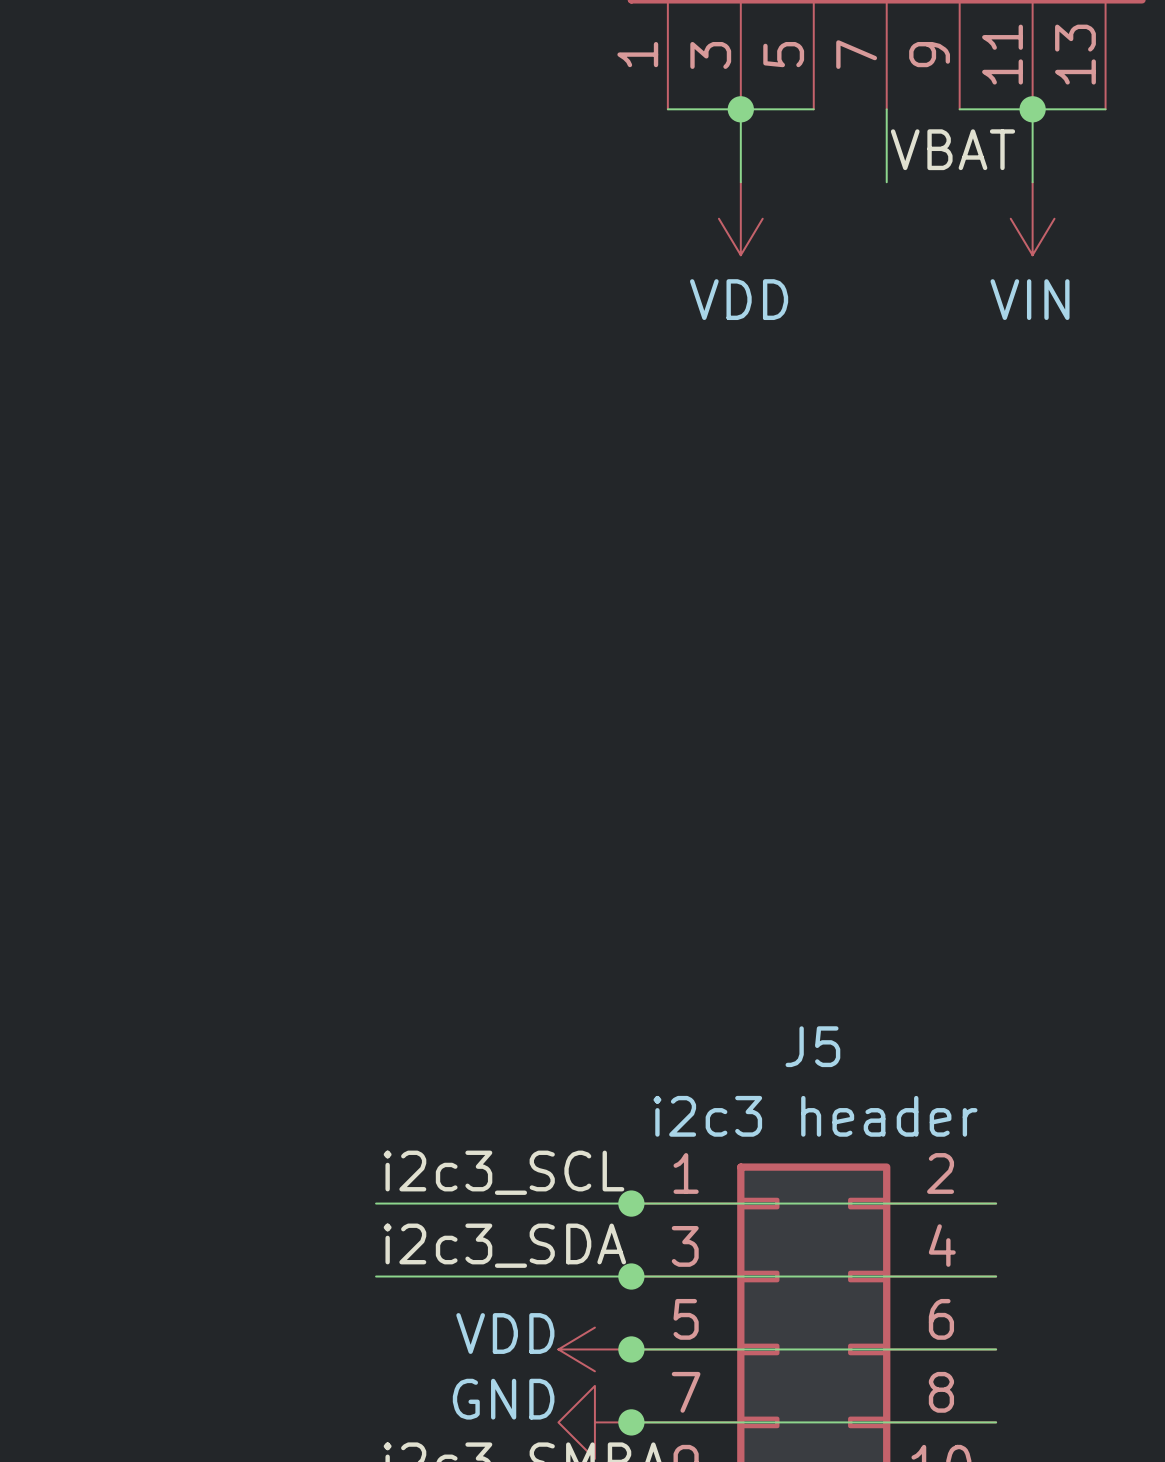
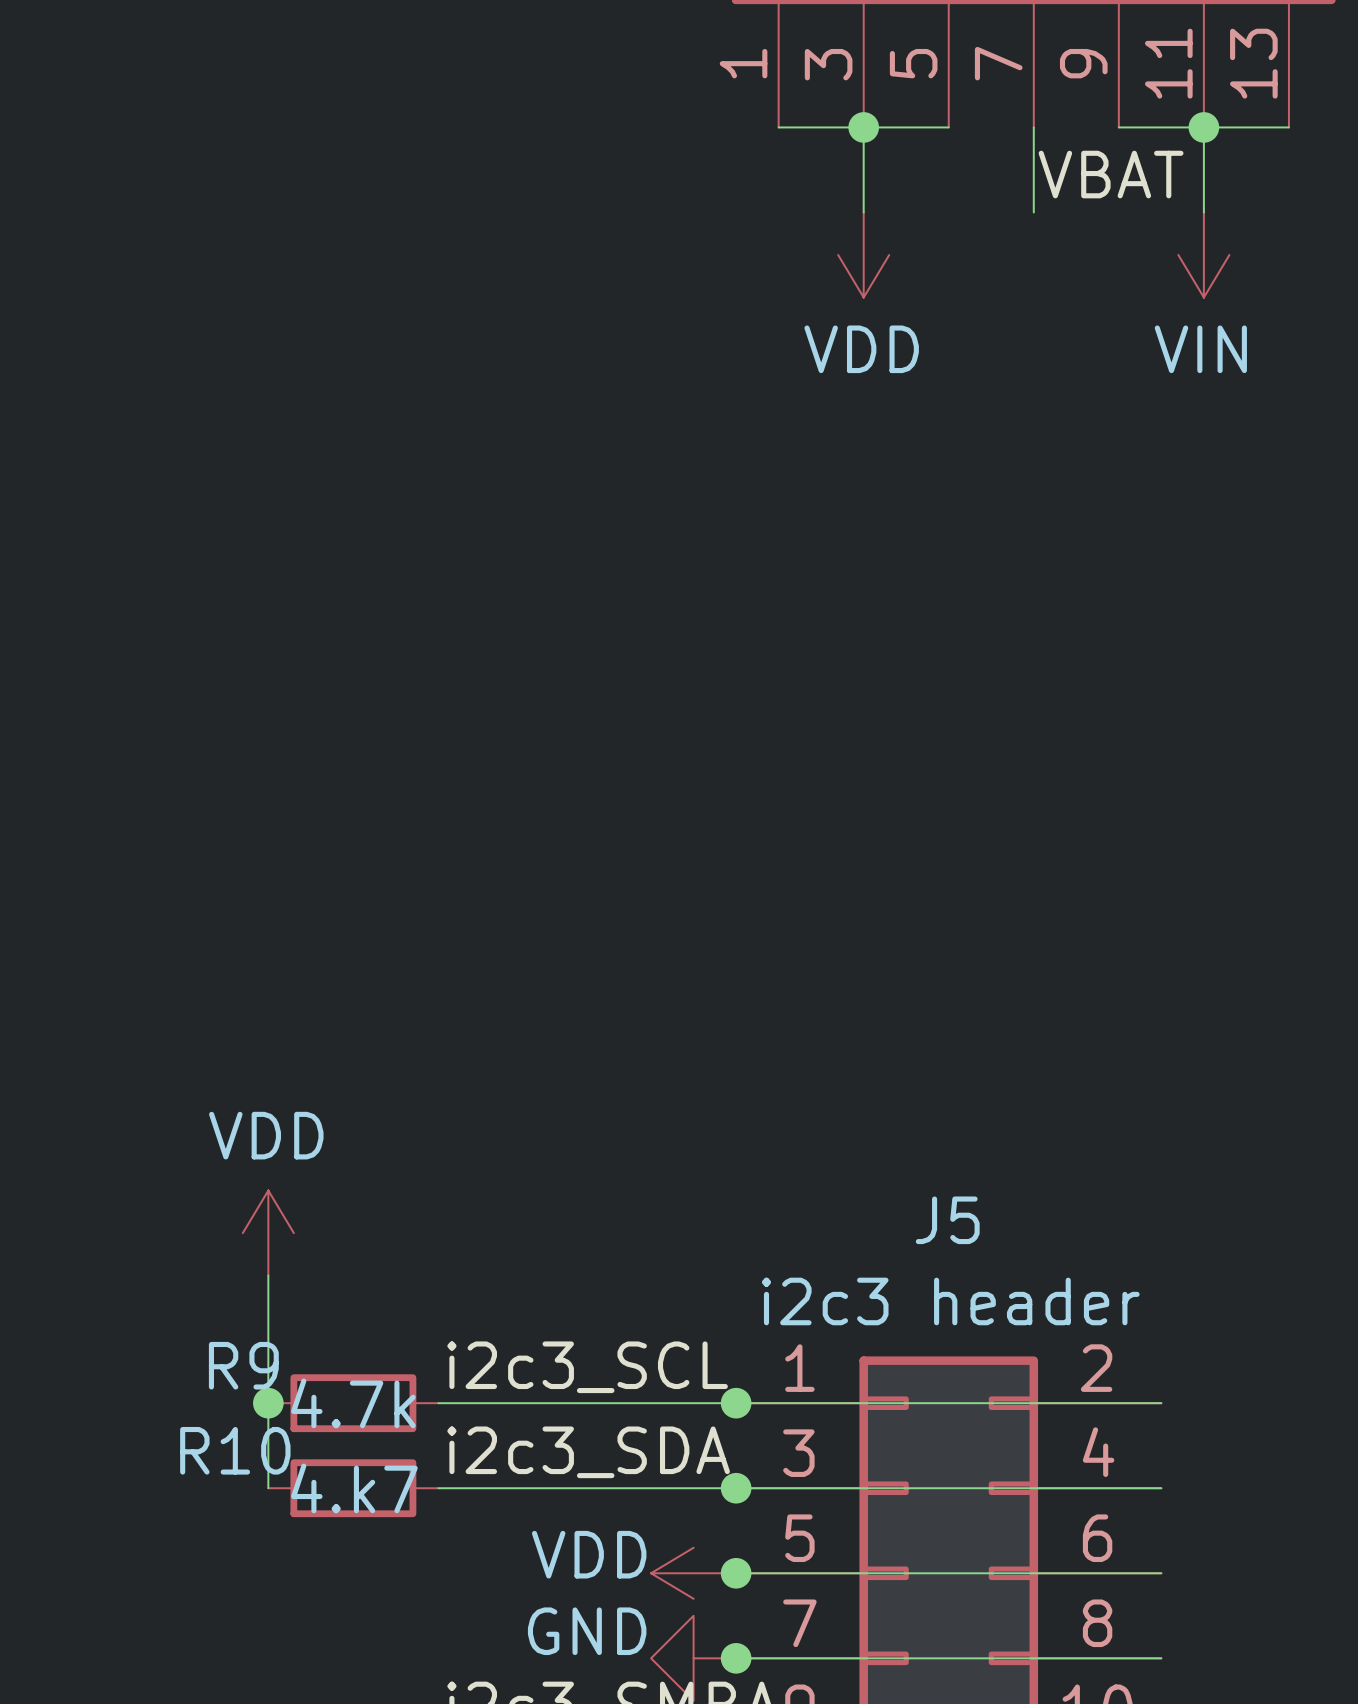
power symbol: none -> VDD (268, 1233)
wire: none -> (268, 1275) (268, 1488)
junction: none -> (268, 1403)
R9: none -> 4.7k (353, 1403)
R10: none -> 4.k7 (353, 1488)

